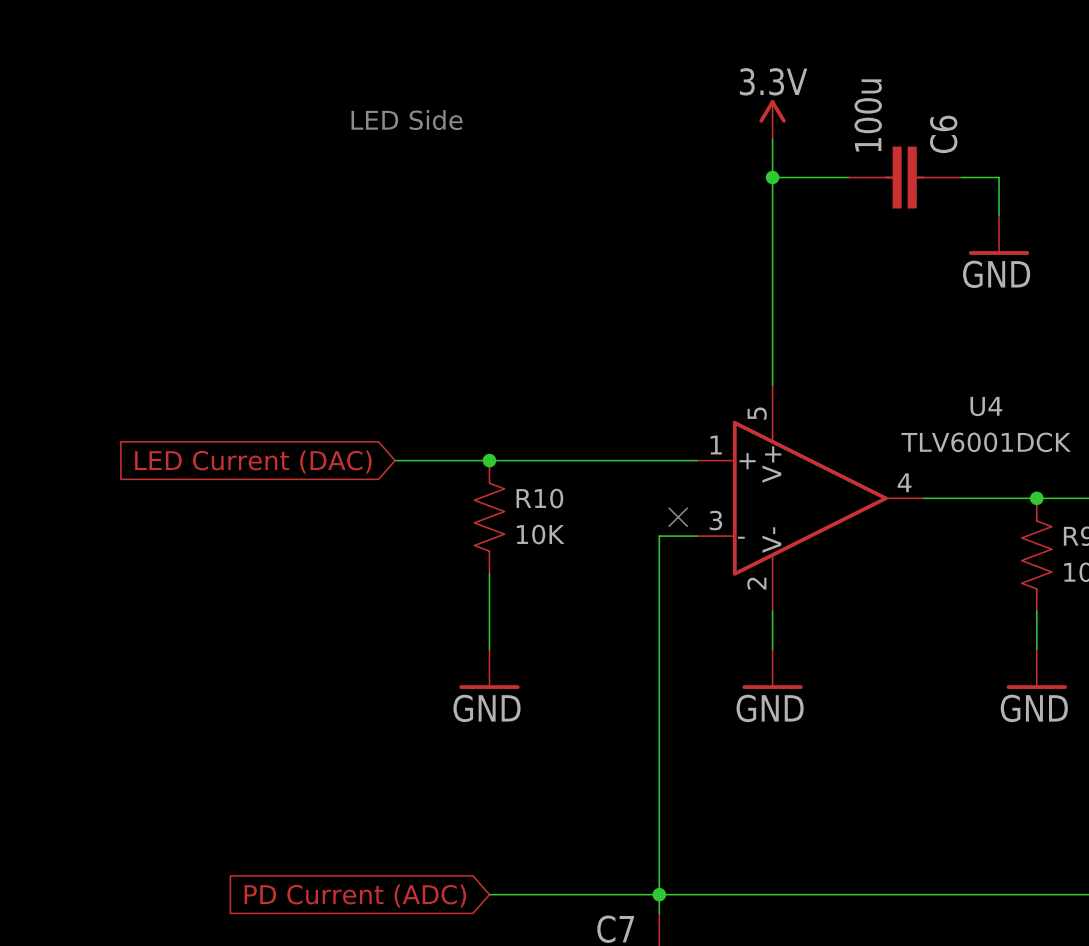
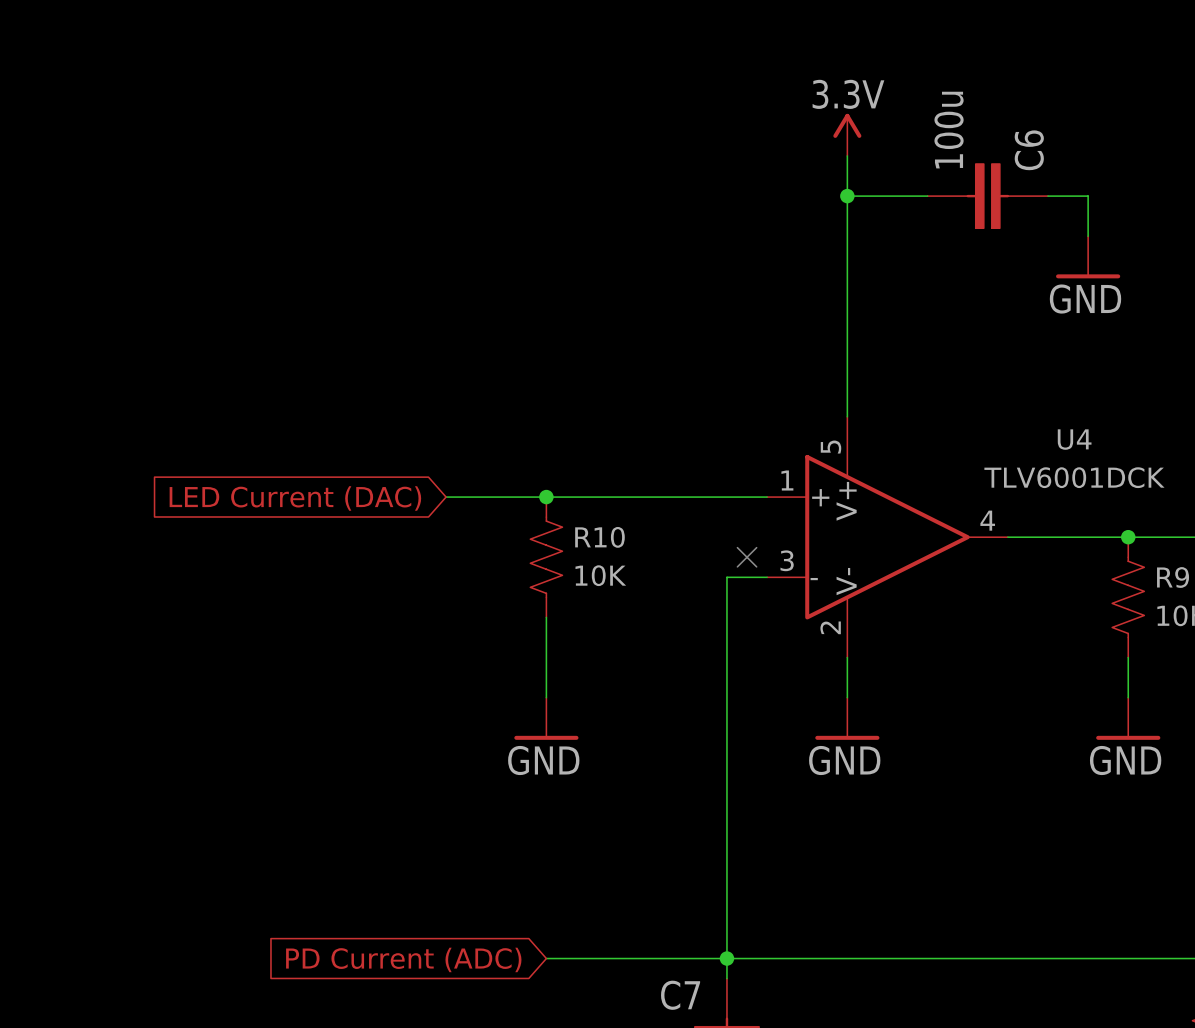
text: LED Side (407, 120) -> none

